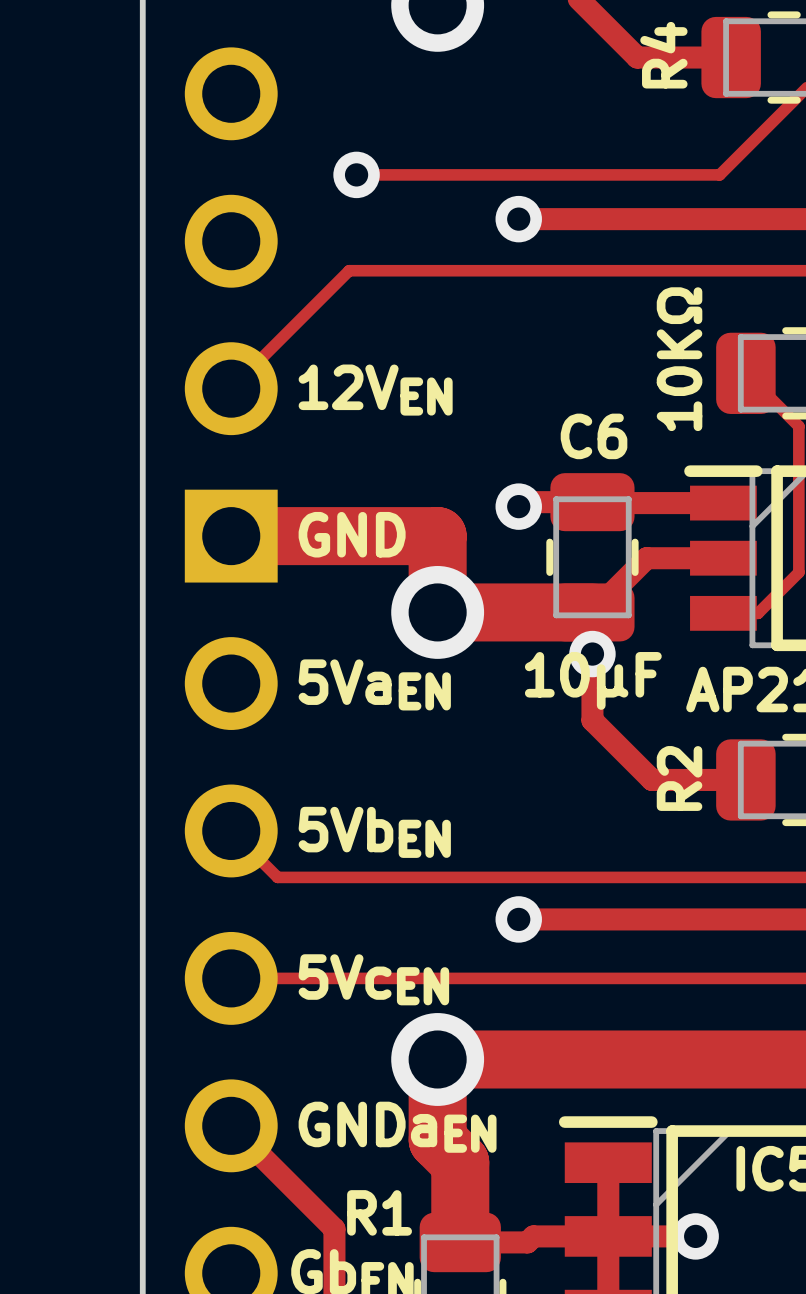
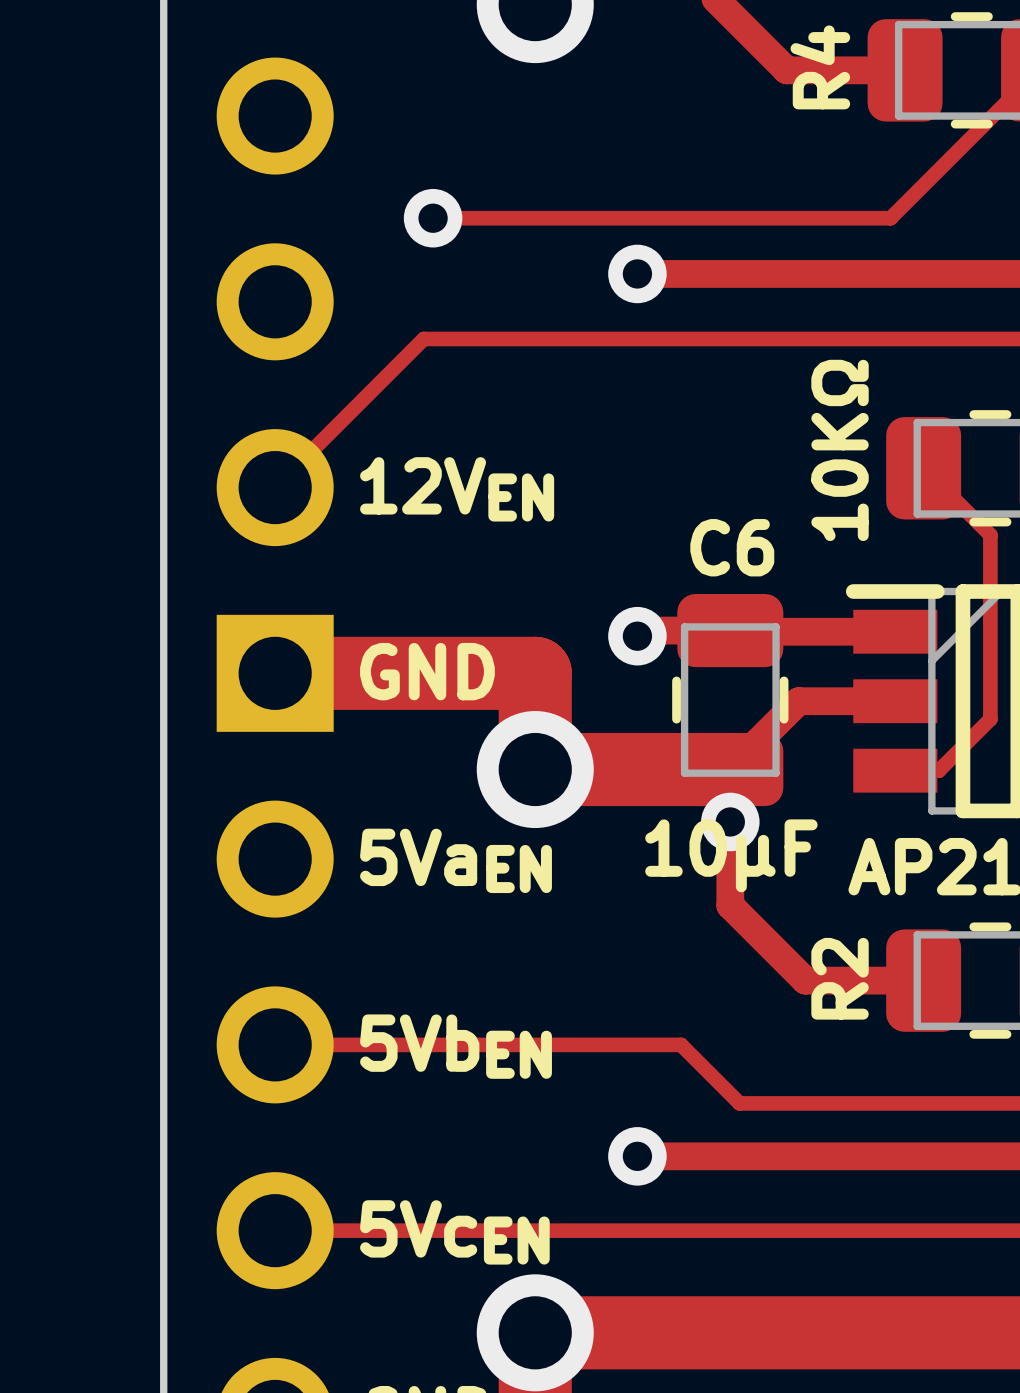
track: (231, 830) (277, 877) (599, 877) -> (275, 1044) (681, 1044) (739, 1103)

